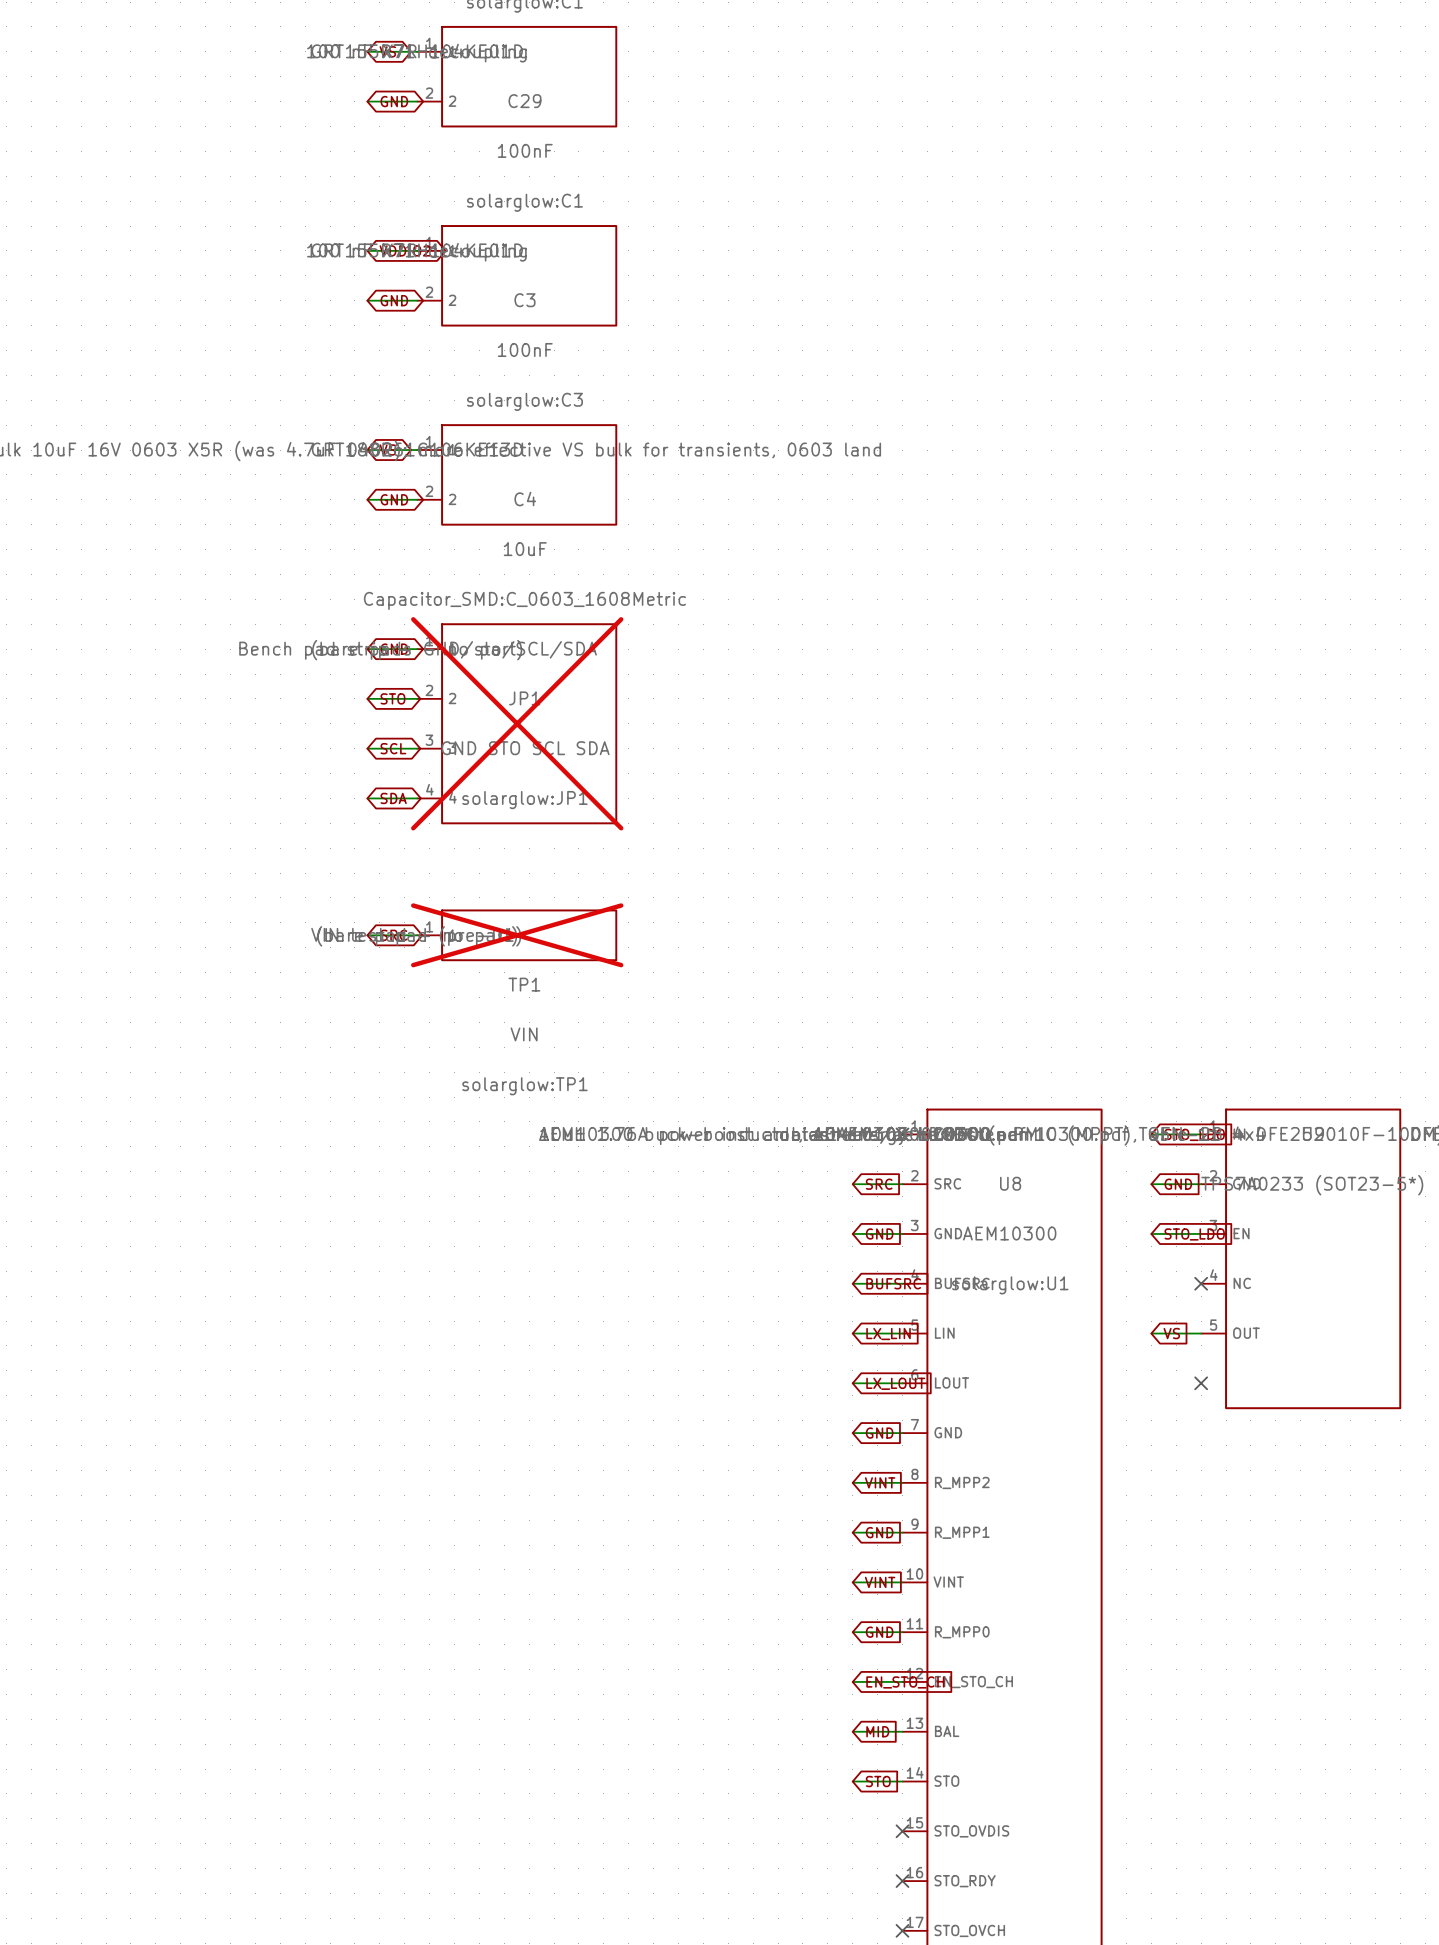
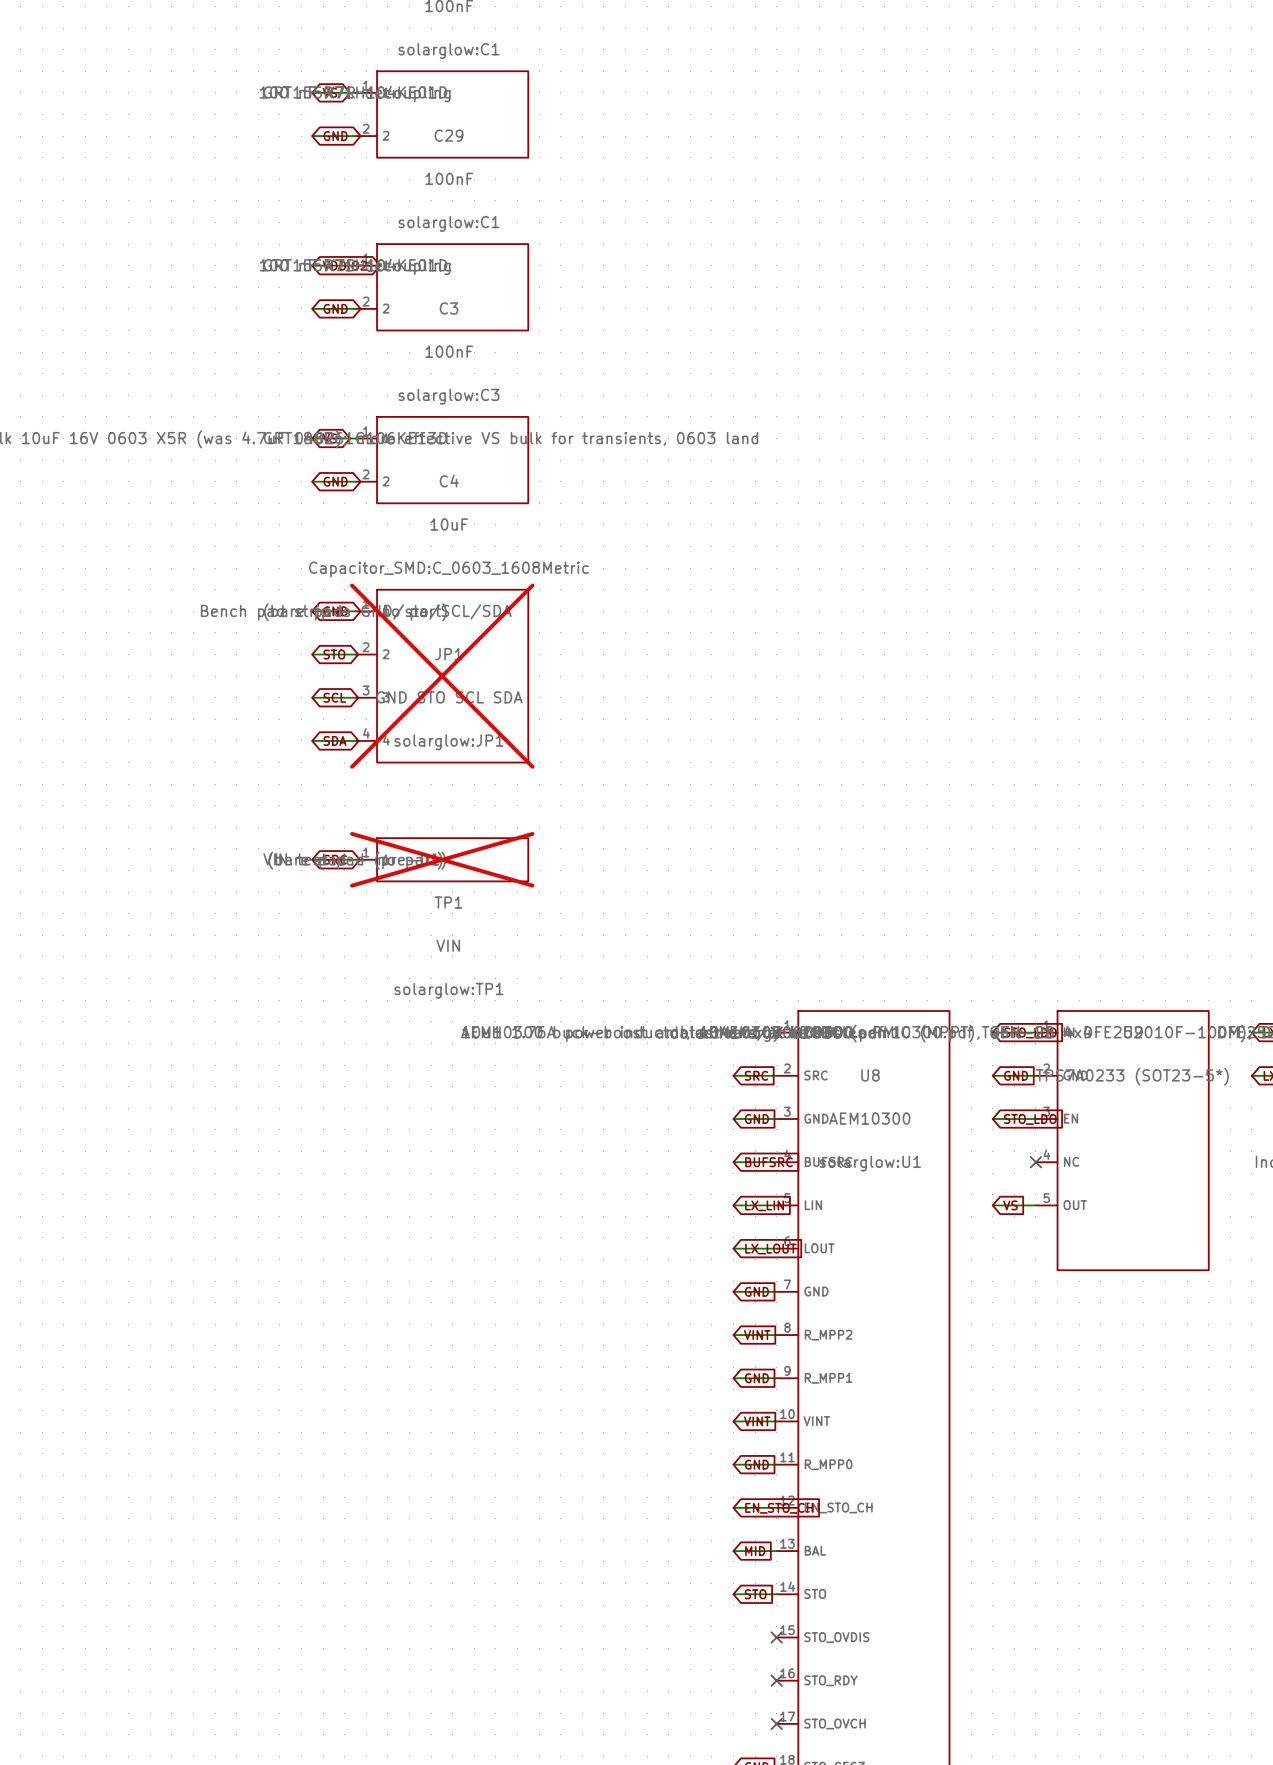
no-connect mark: (1201, 1383) -> none

